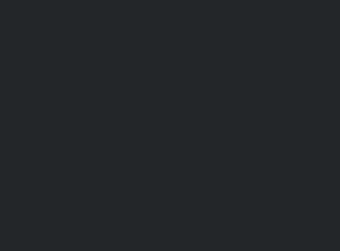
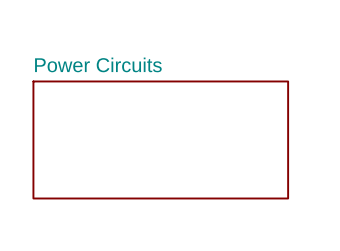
sheet Power Circuits: none -> (160, 139)

